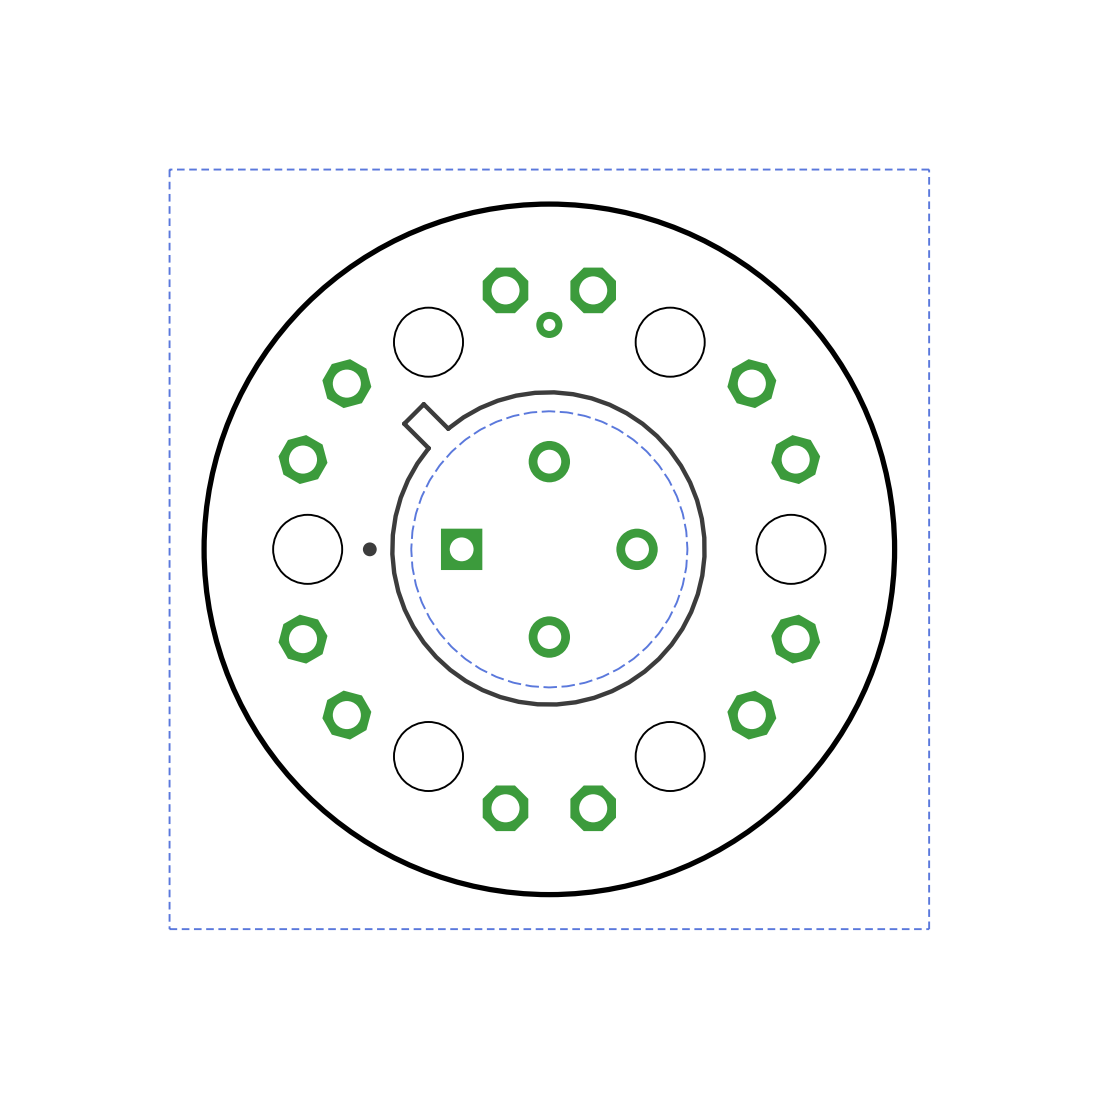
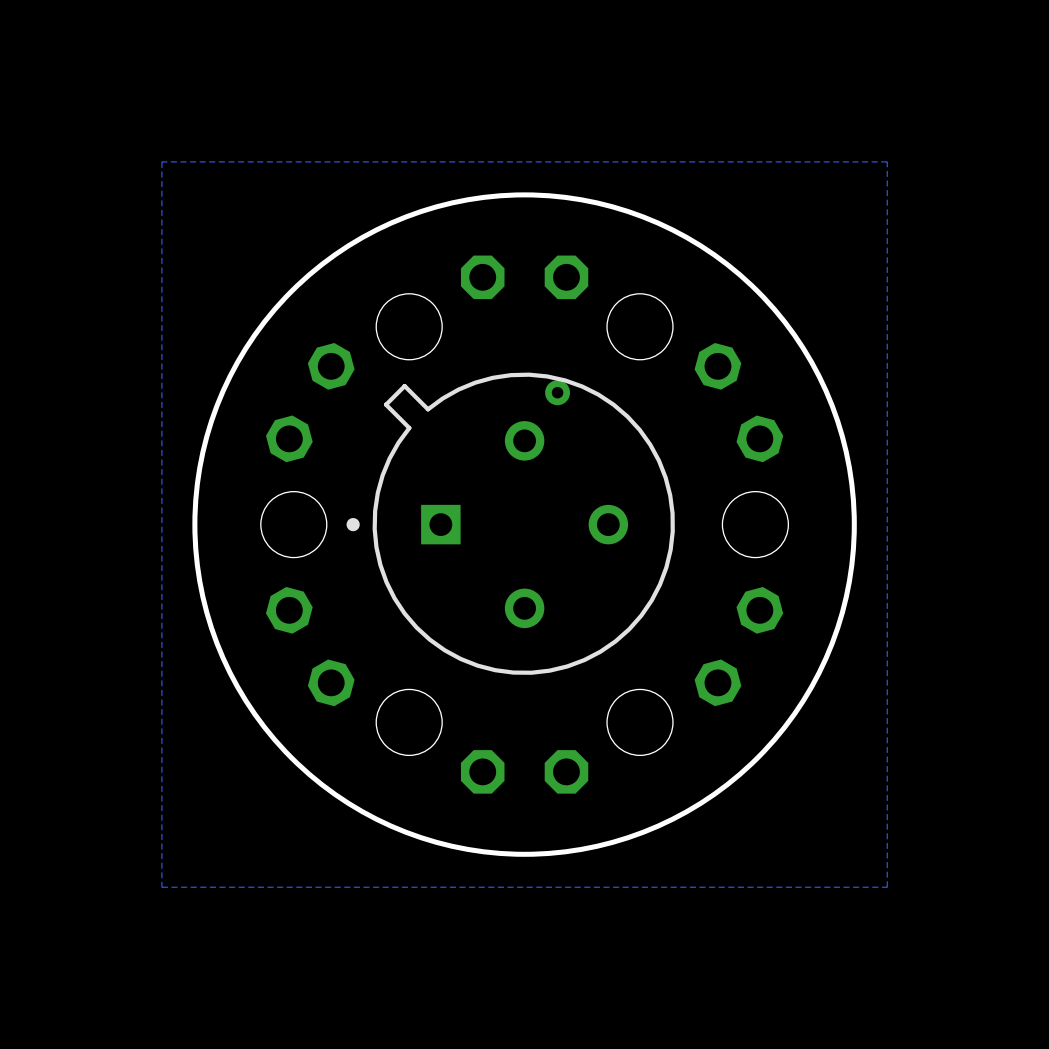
via position: (549, 324) -> (557, 392)
zone outline: (549, 411) (567, 412) (602, 421) (633, 439) (647, 451) (668, 480) (676, 496) (686, 531) (687, 549) (686, 567) (676, 602) (658, 633) (647, 647) (618, 668) (602, 676) (567, 686) (549, 687) (531, 686) (496, 676) (480, 668) (451, 647) (429, 618) (421, 602) (412, 567) (411, 549) (412, 531) (421, 496) (429, 480) (451, 451) (480, 429) (496, 421) (531, 412) (549, 411) -> none

